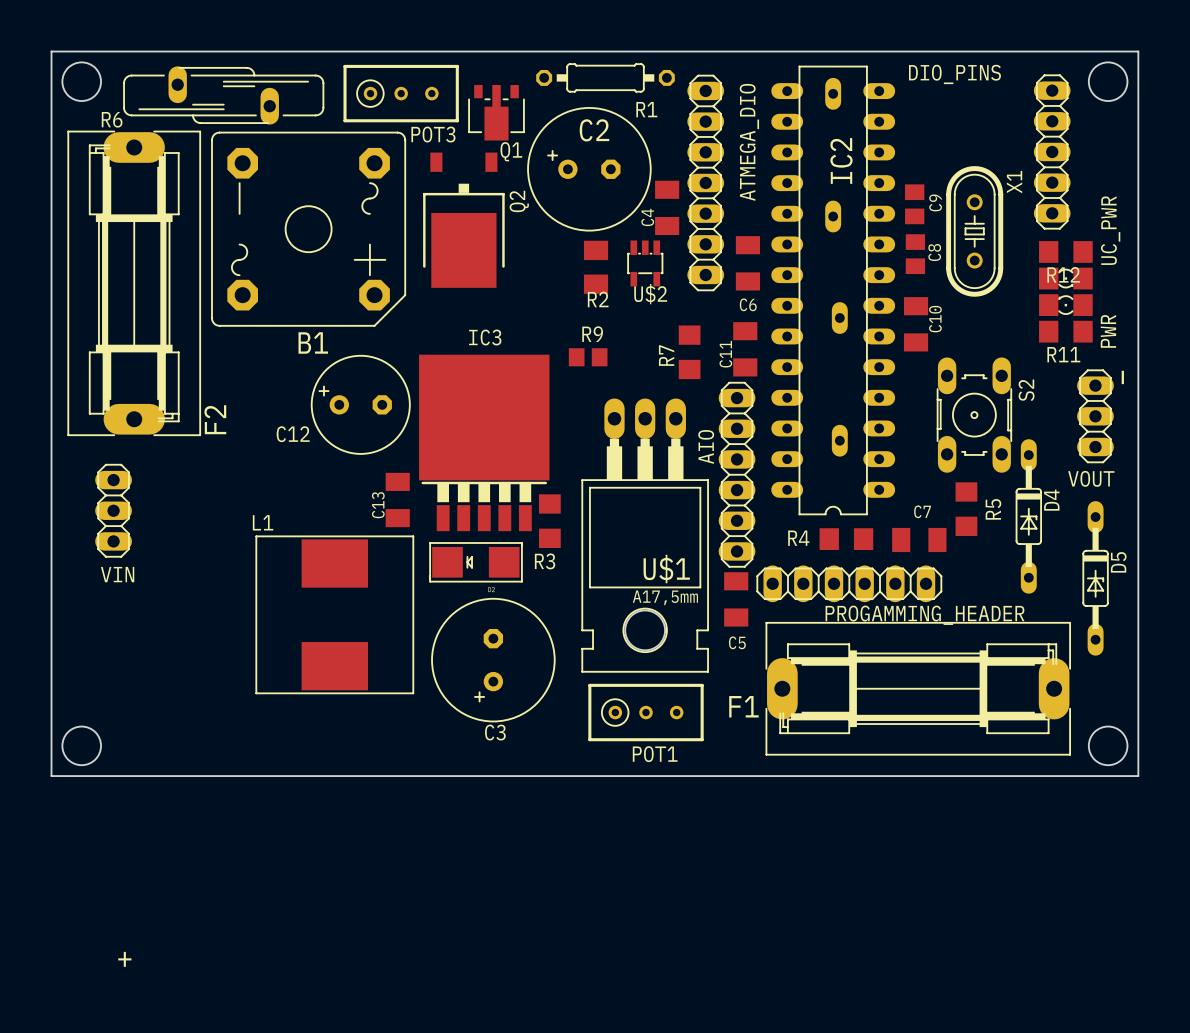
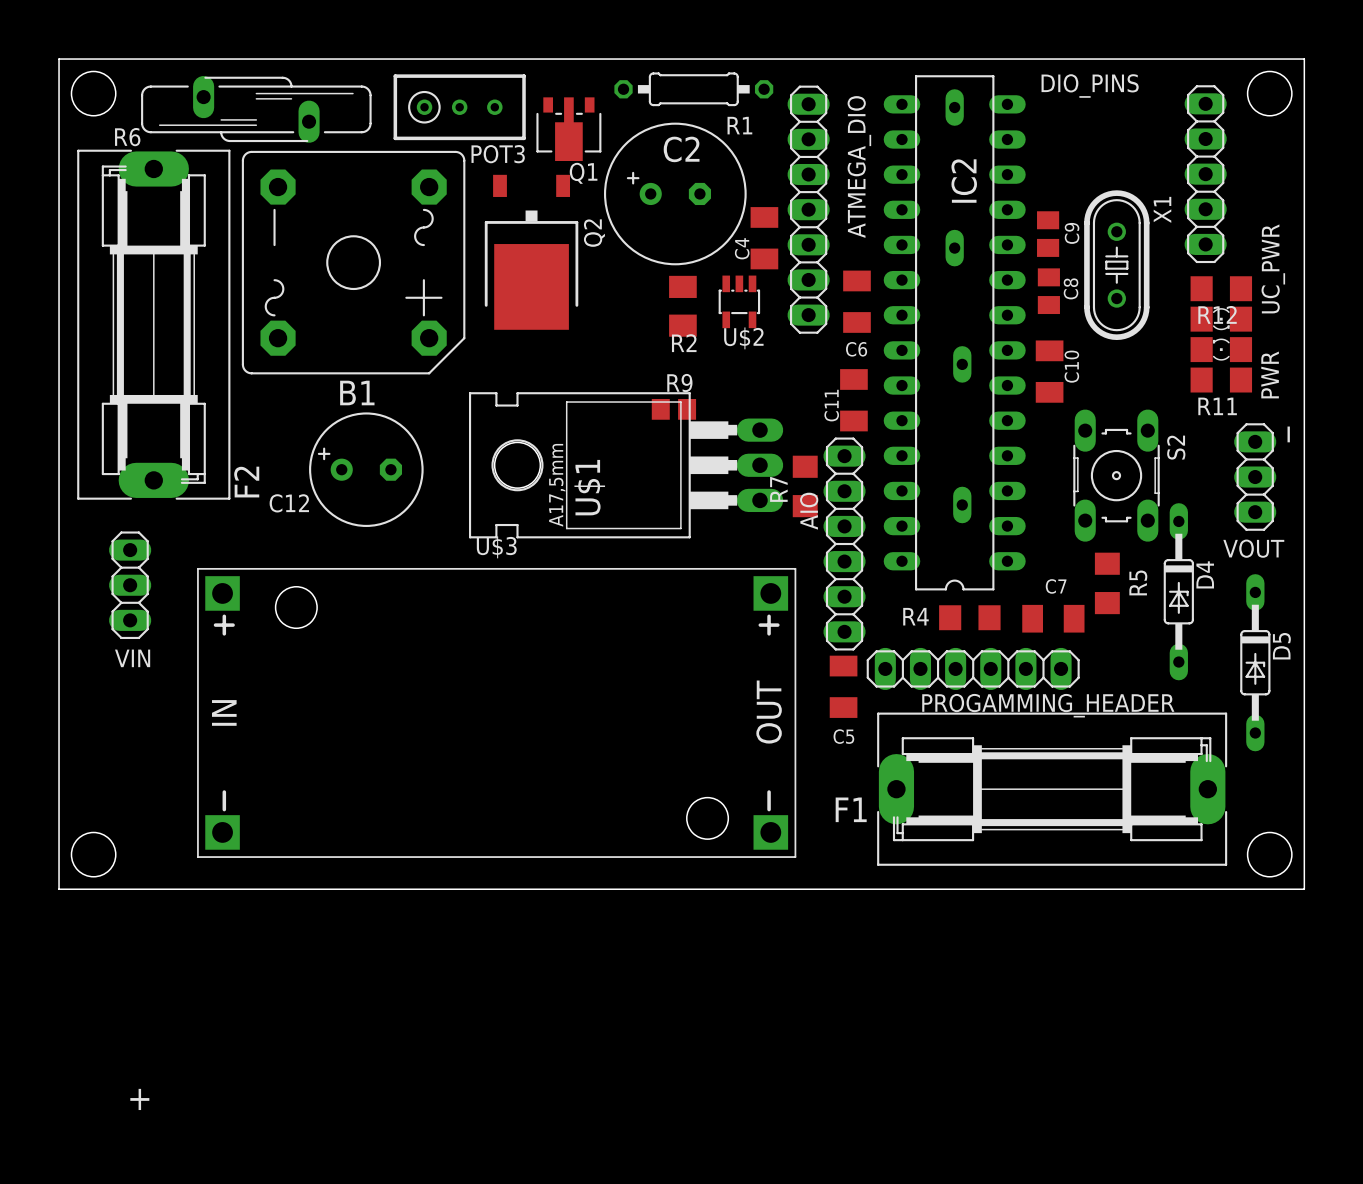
R7 position: (689, 352) -> (805, 486)
U$1 footprint: [581, 398, 709, 673] -> [468, 392, 784, 539]
C12 position: (360, 404) -> (366, 469)
IC3: (484, 442) -> none
C13: (397, 500) -> none
R3: (549, 521) -> none
part: (476, 562) -> none
U$1 name position: U$1 (666, 569) -> U$1 (589, 487)
L1: (334, 614) -> none
U$3: none -> (496, 712)
C3: (493, 660) -> none
POT1: (646, 712) -> none

